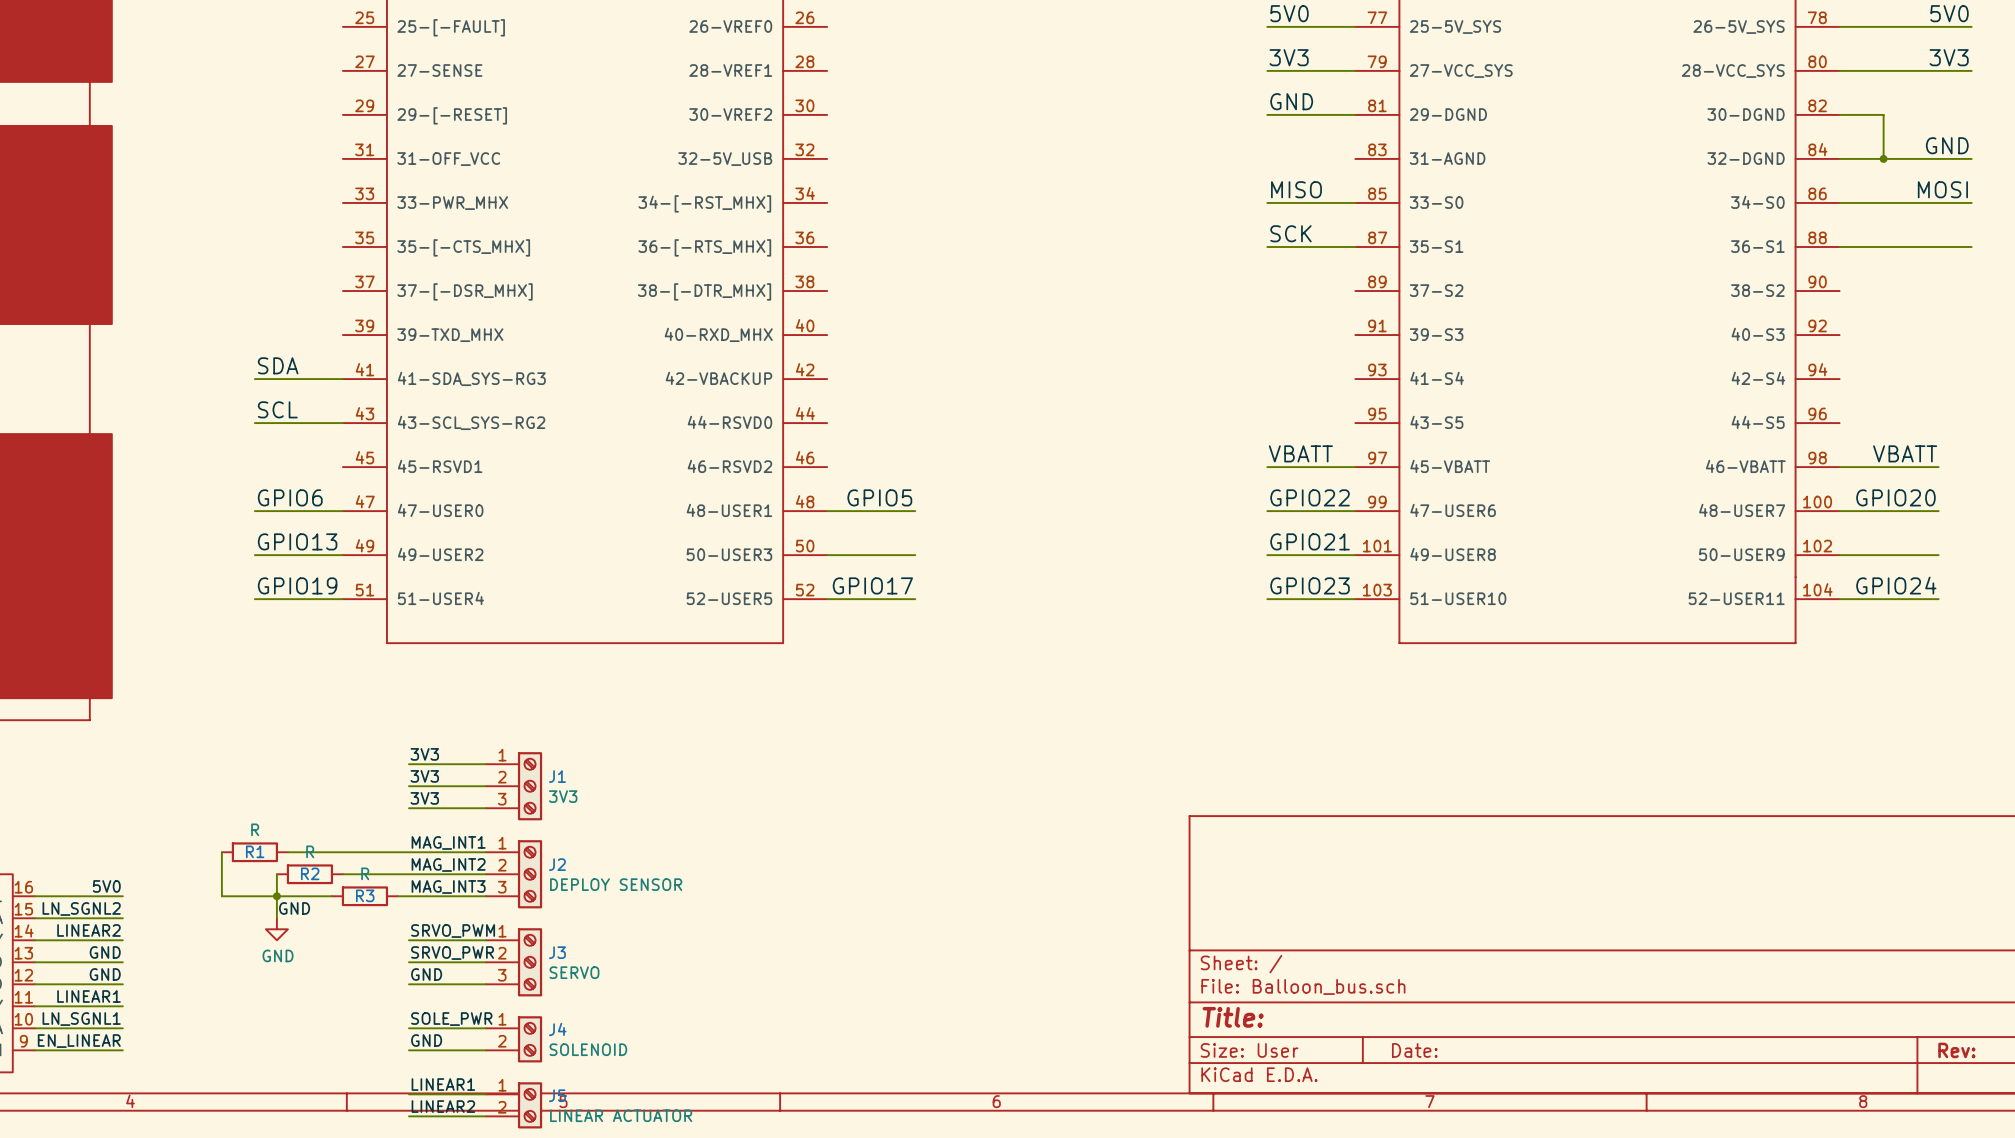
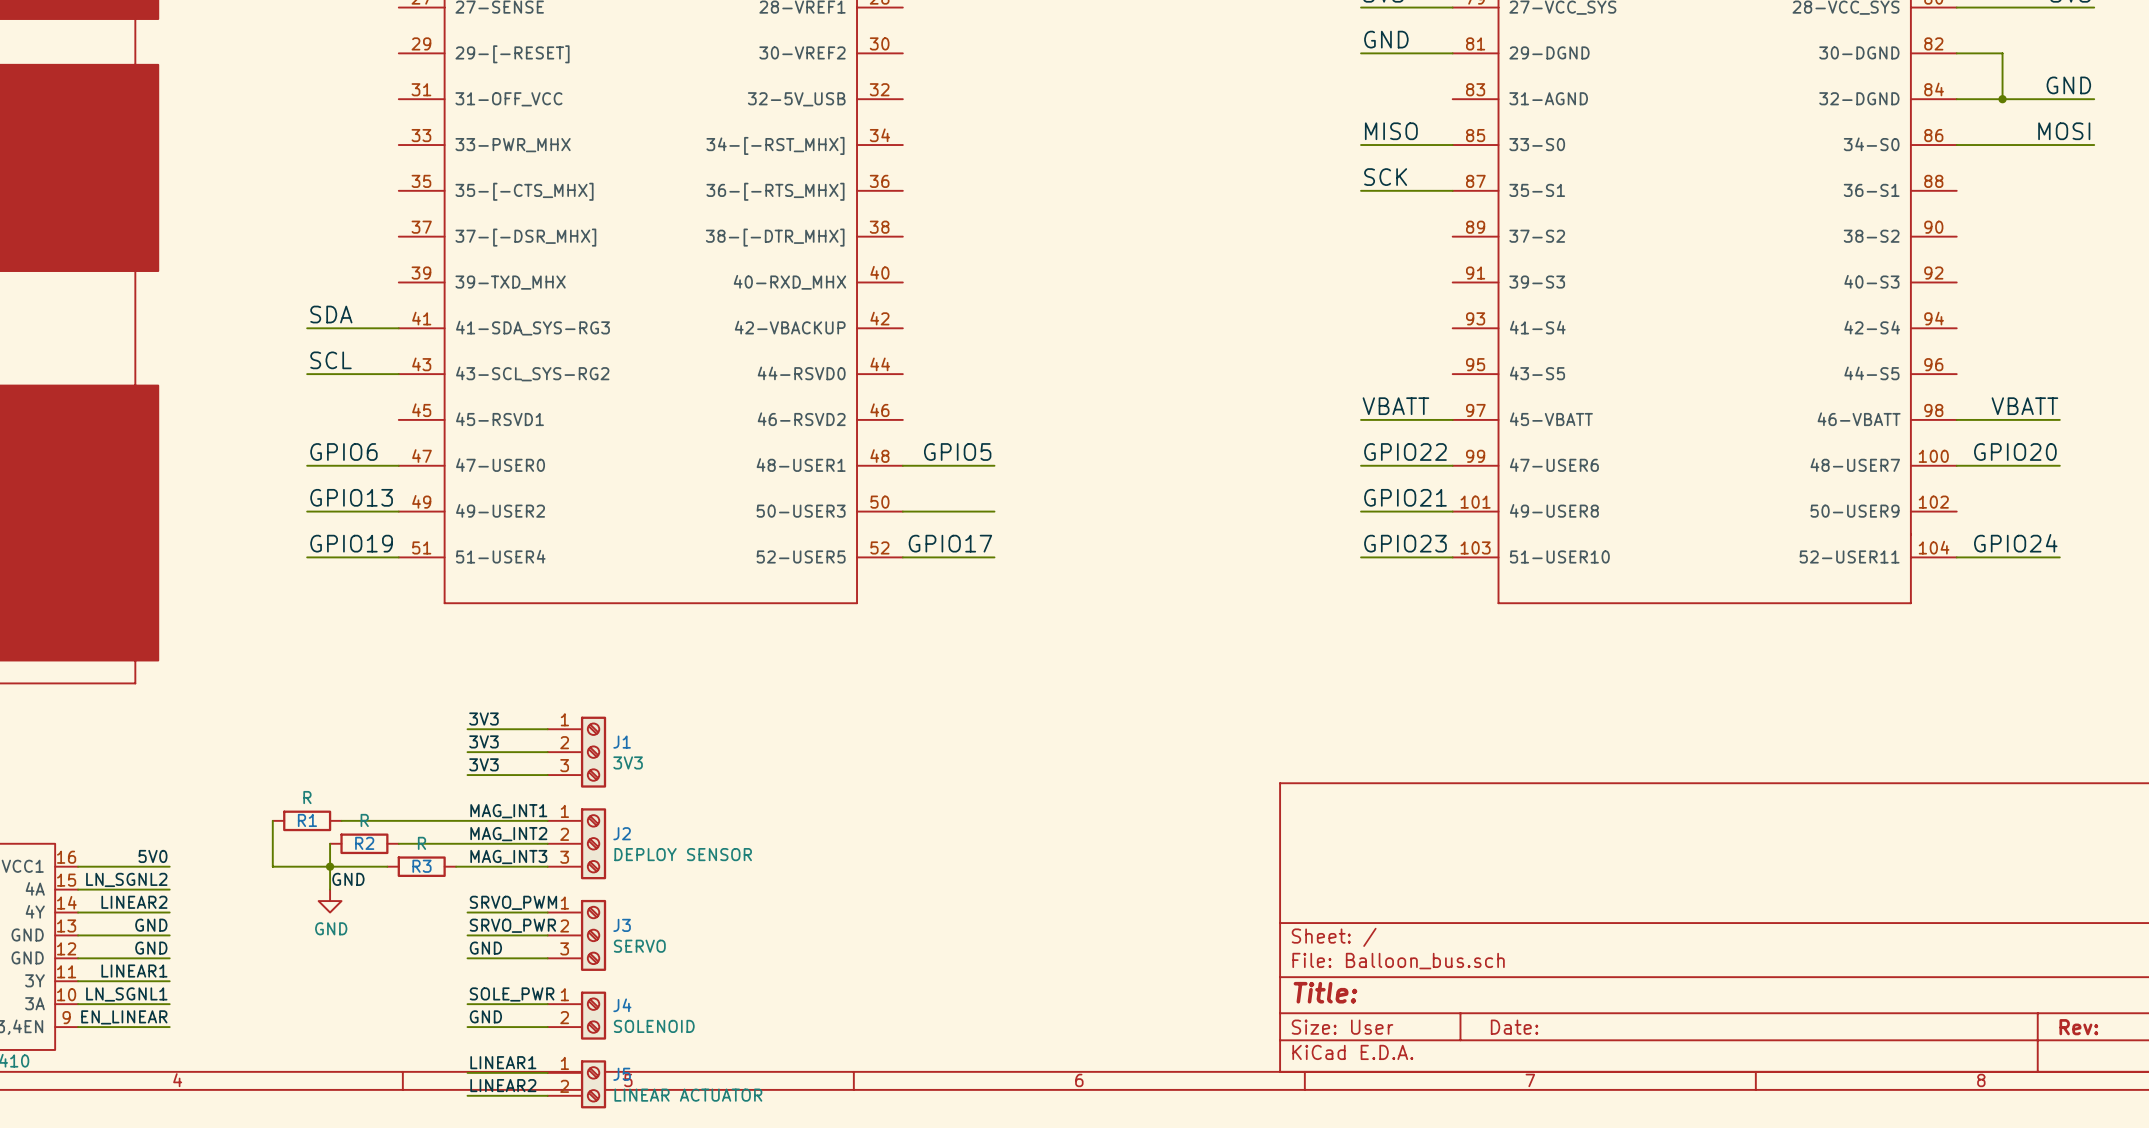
wire: (1839, 246) (1971, 246) -> none
wire: (1839, 555) (1938, 555) -> none

